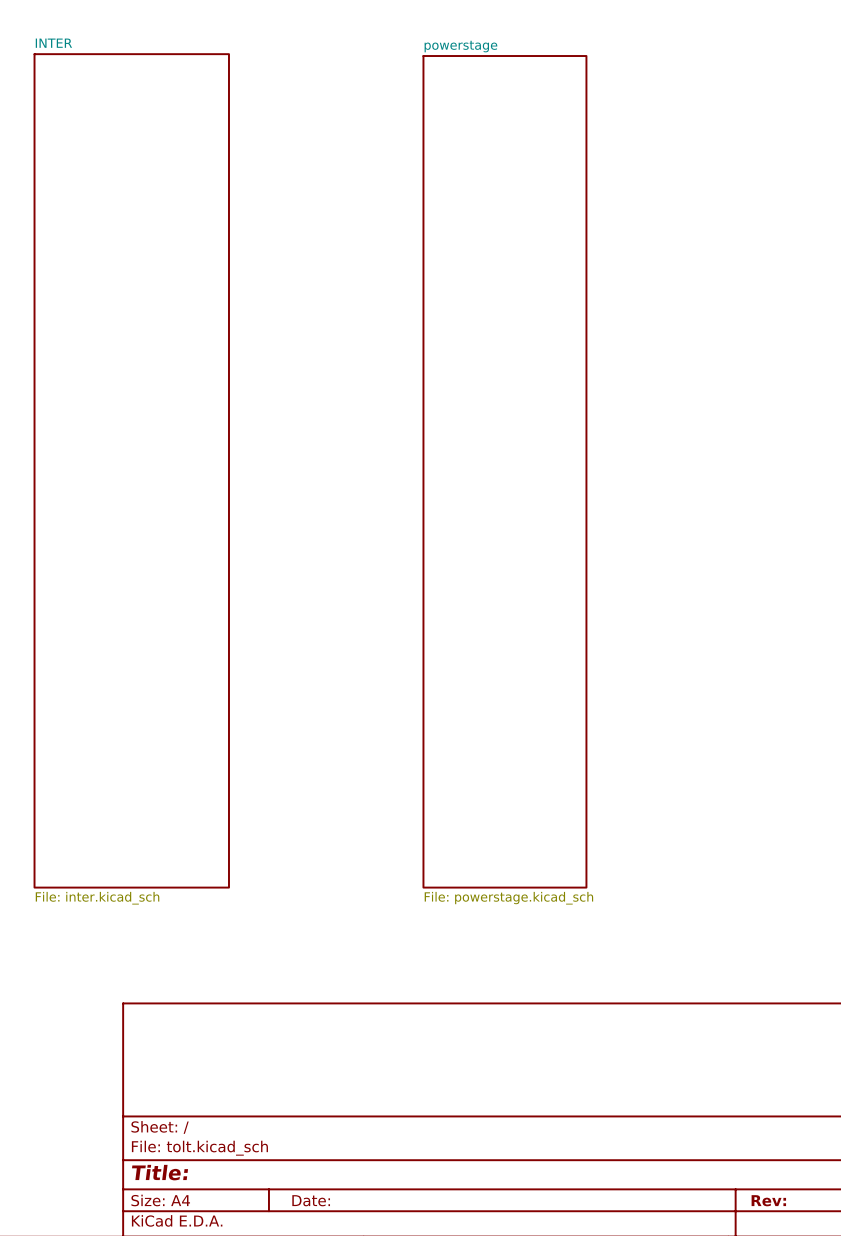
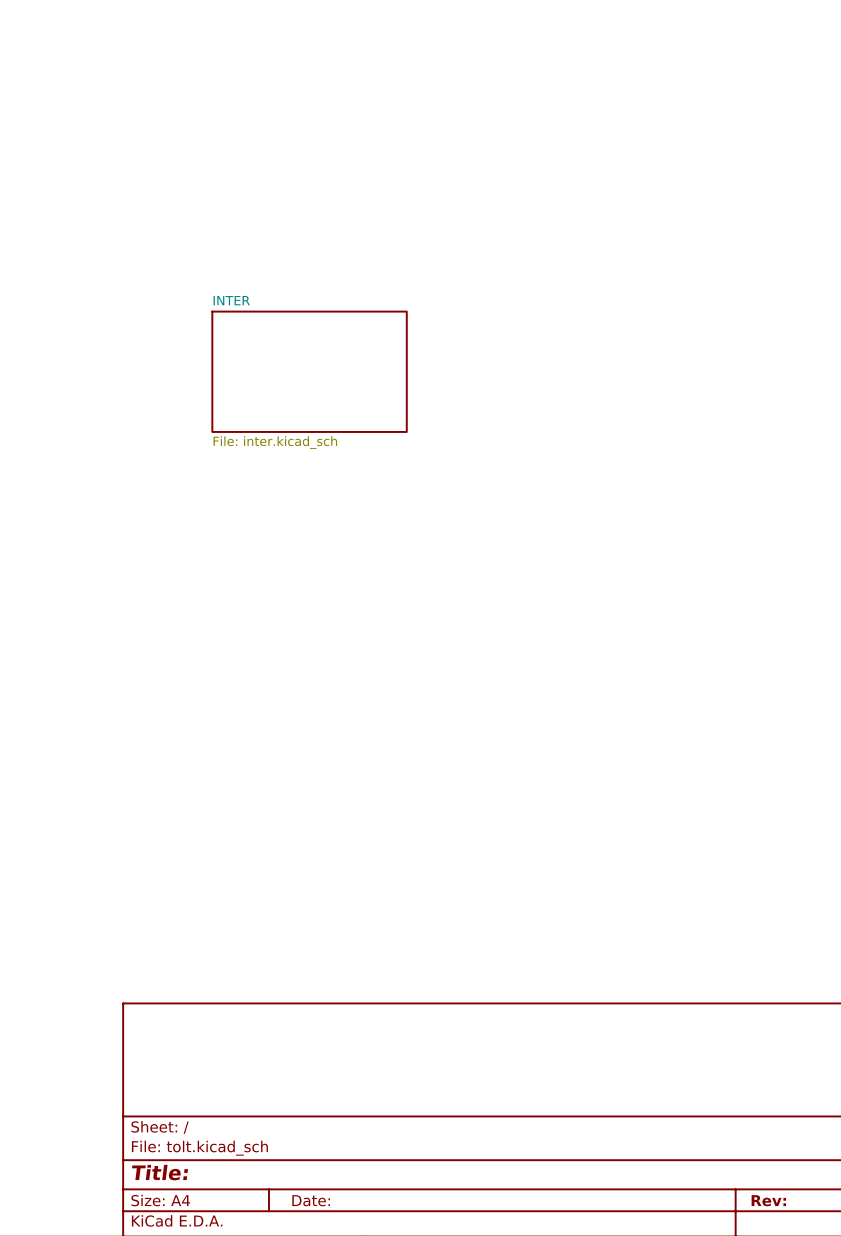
sheet INTER: none -> File: inter.kicad_sch (309, 371)
sheet INTER: File: inter.kicad_sch (131, 470) -> none
sheet powerstage: File: powerstage.kicad_sch (504, 471) -> none

